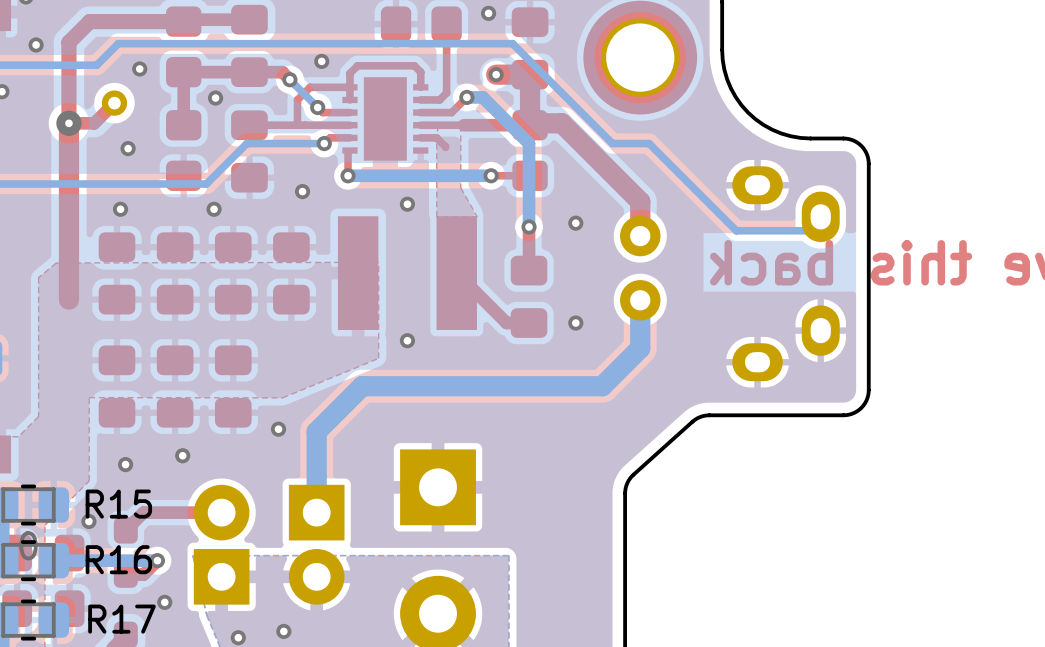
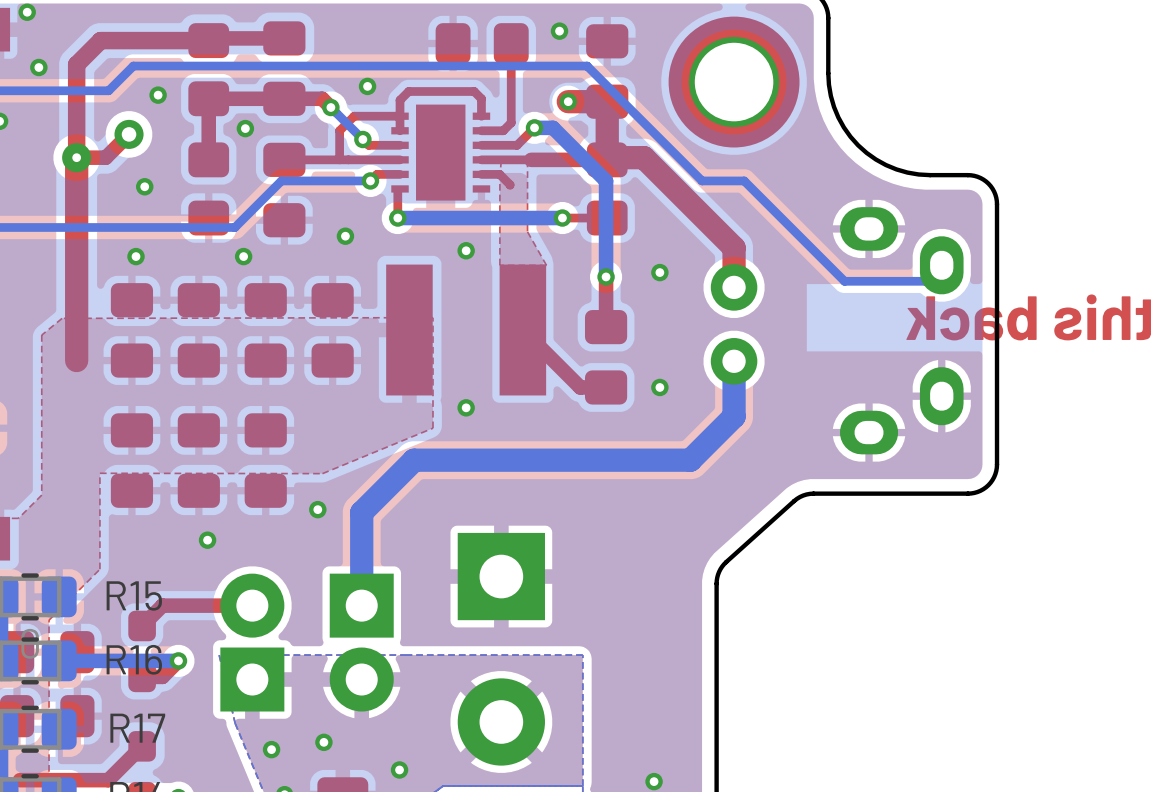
via: (125, 464) -> none
via: (88, 521) -> none
via: (164, 602) -> none

